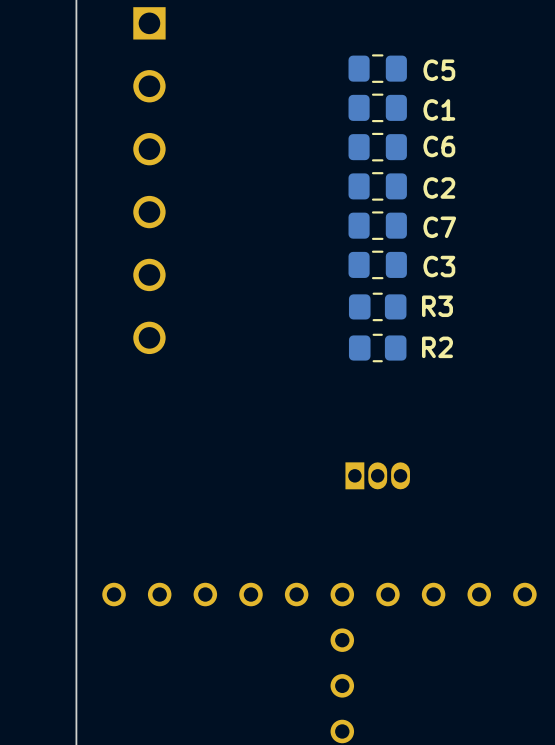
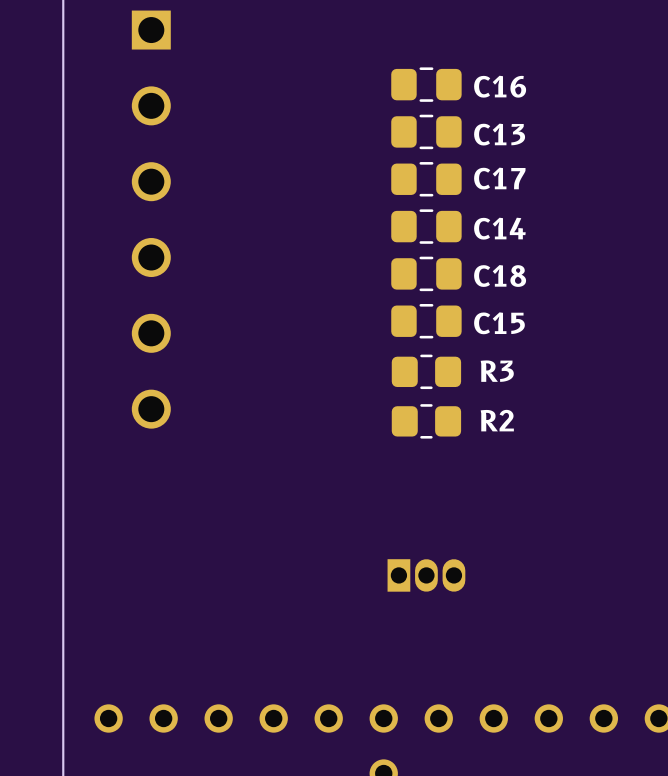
C5 name: C5 (439, 70) -> C16 (500, 86)
C1 name: C1 (439, 109) -> C13 (499, 134)
C6 name: C6 (439, 146) -> C17 (499, 178)
C2 name: C2 (439, 188) -> C14 (499, 228)
C7 name: C7 (439, 227) -> C18 (500, 275)
C3 name: C3 (439, 266) -> C15 (499, 323)

